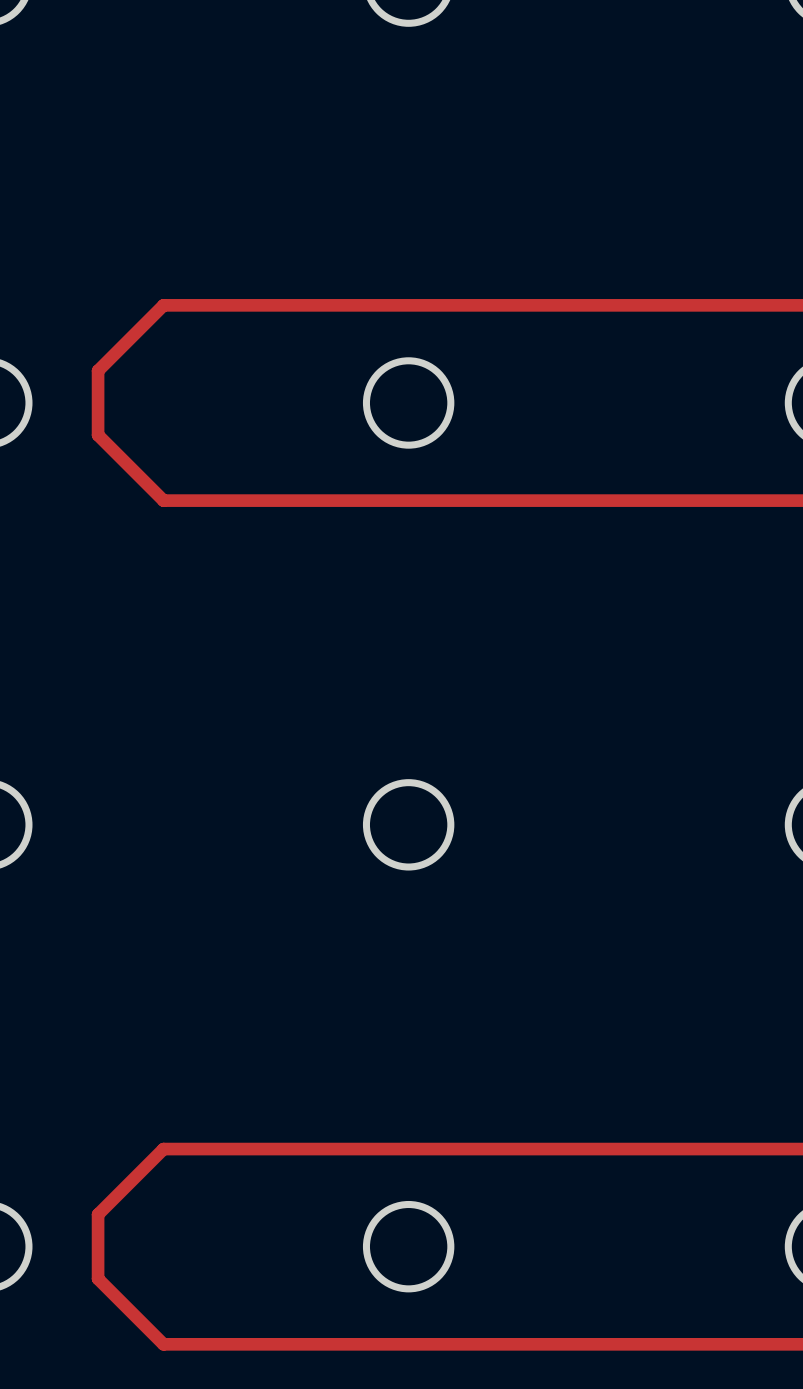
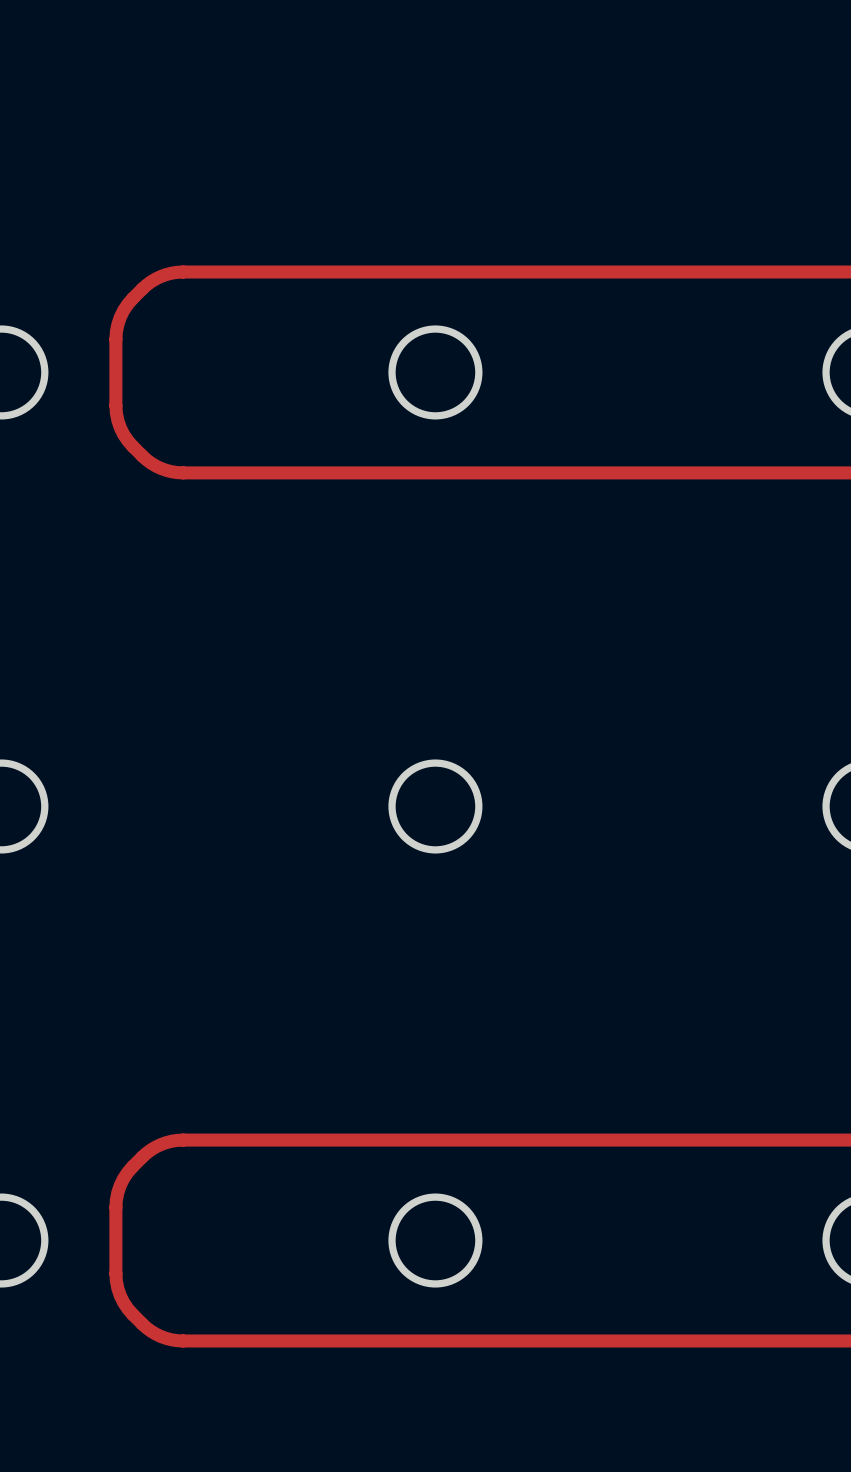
top track: (163, 305) (98, 370) -> (183, 272) (166, 274) (155, 278) (132, 298) (120, 317) (115, 339)
top track: (98, 435) (163, 500) -> (115, 405) (120, 427) (132, 446) (155, 466) (166, 470) (183, 472)
top track: (163, 1149) (98, 1214) -> (183, 1140) (166, 1142) (155, 1146) (132, 1166) (120, 1185) (115, 1207)
top track: (98, 1278) (163, 1344) -> (115, 1273) (120, 1295) (132, 1314) (155, 1334) (166, 1338) (183, 1340)

